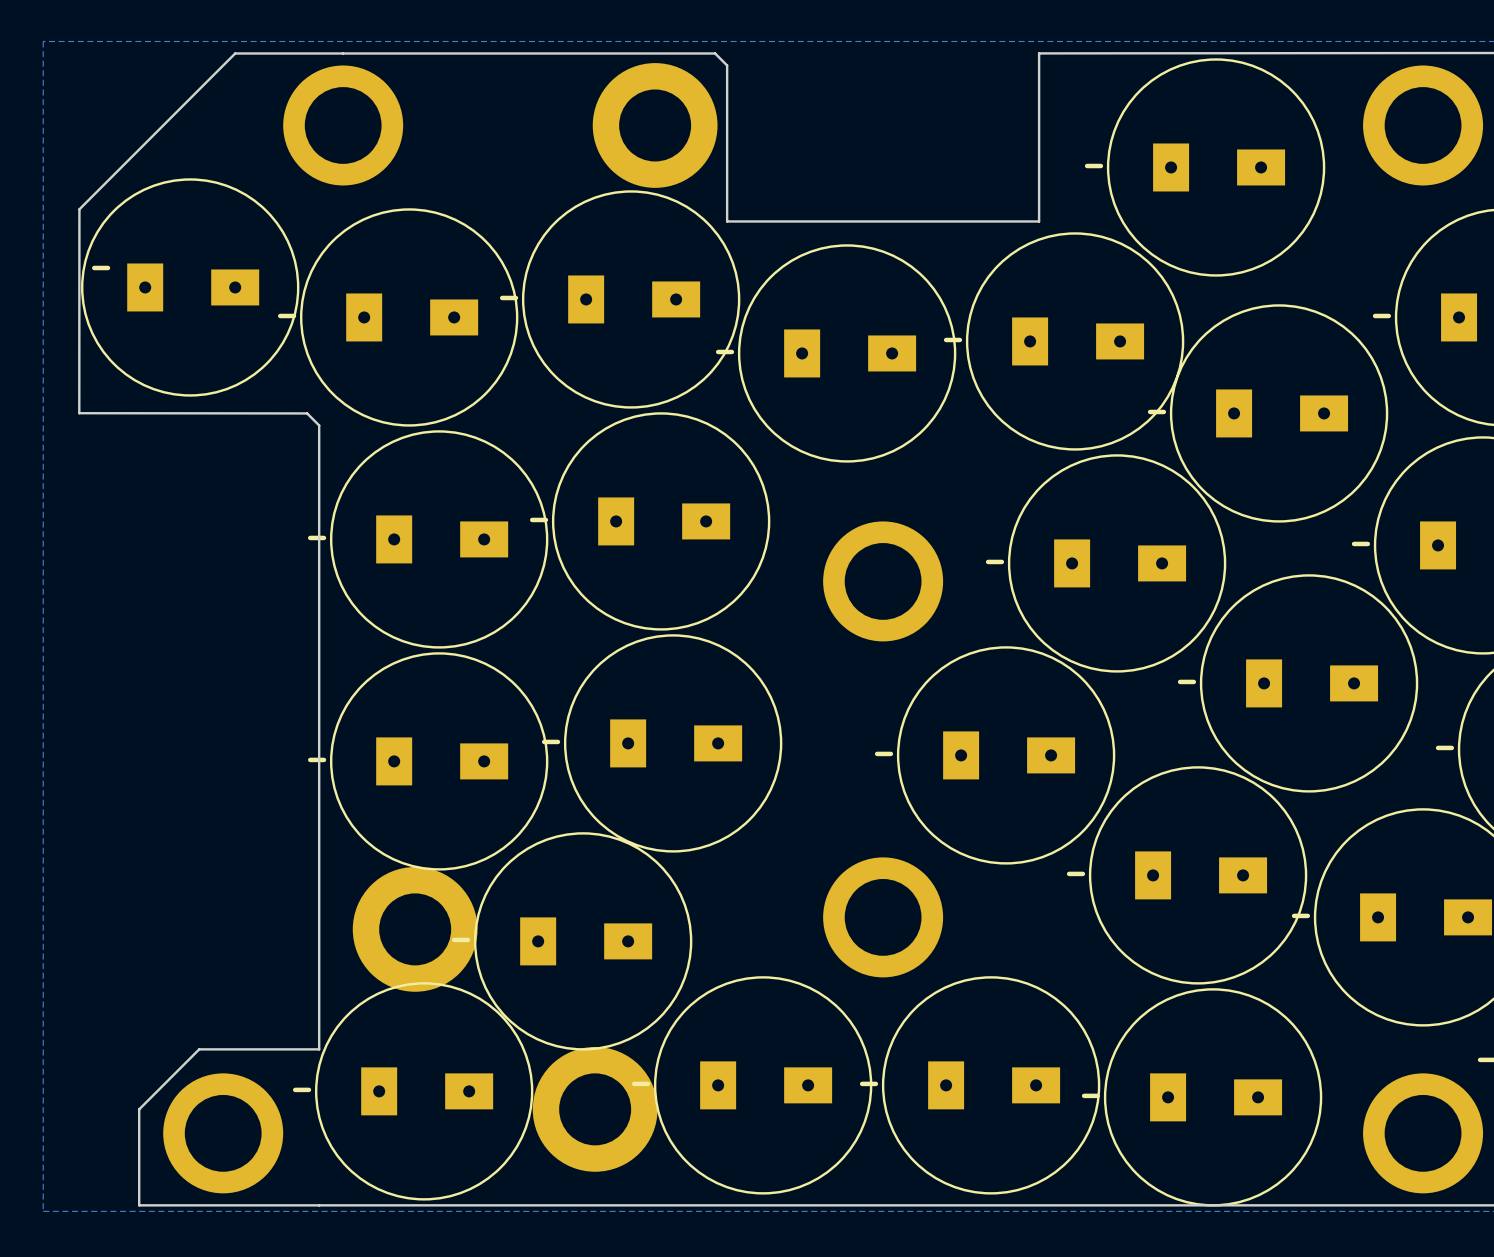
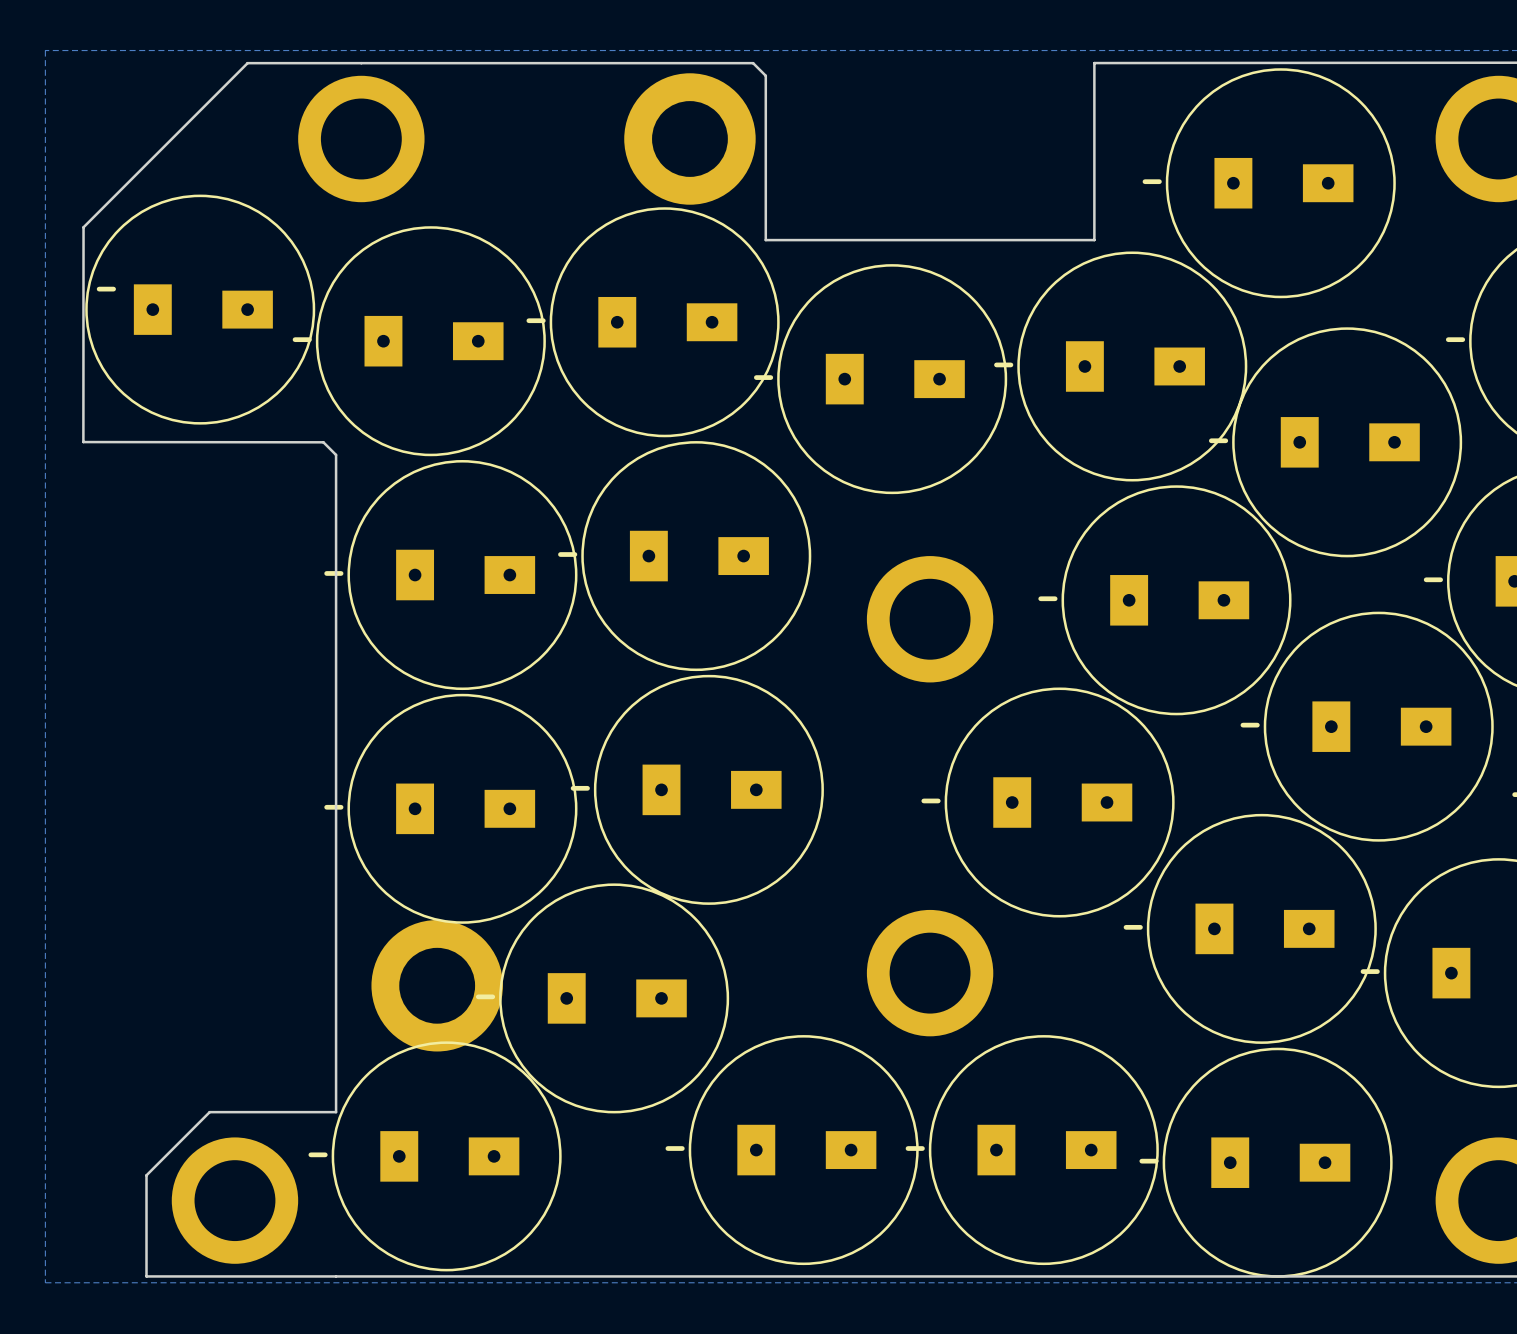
part: (595, 1109) -> none

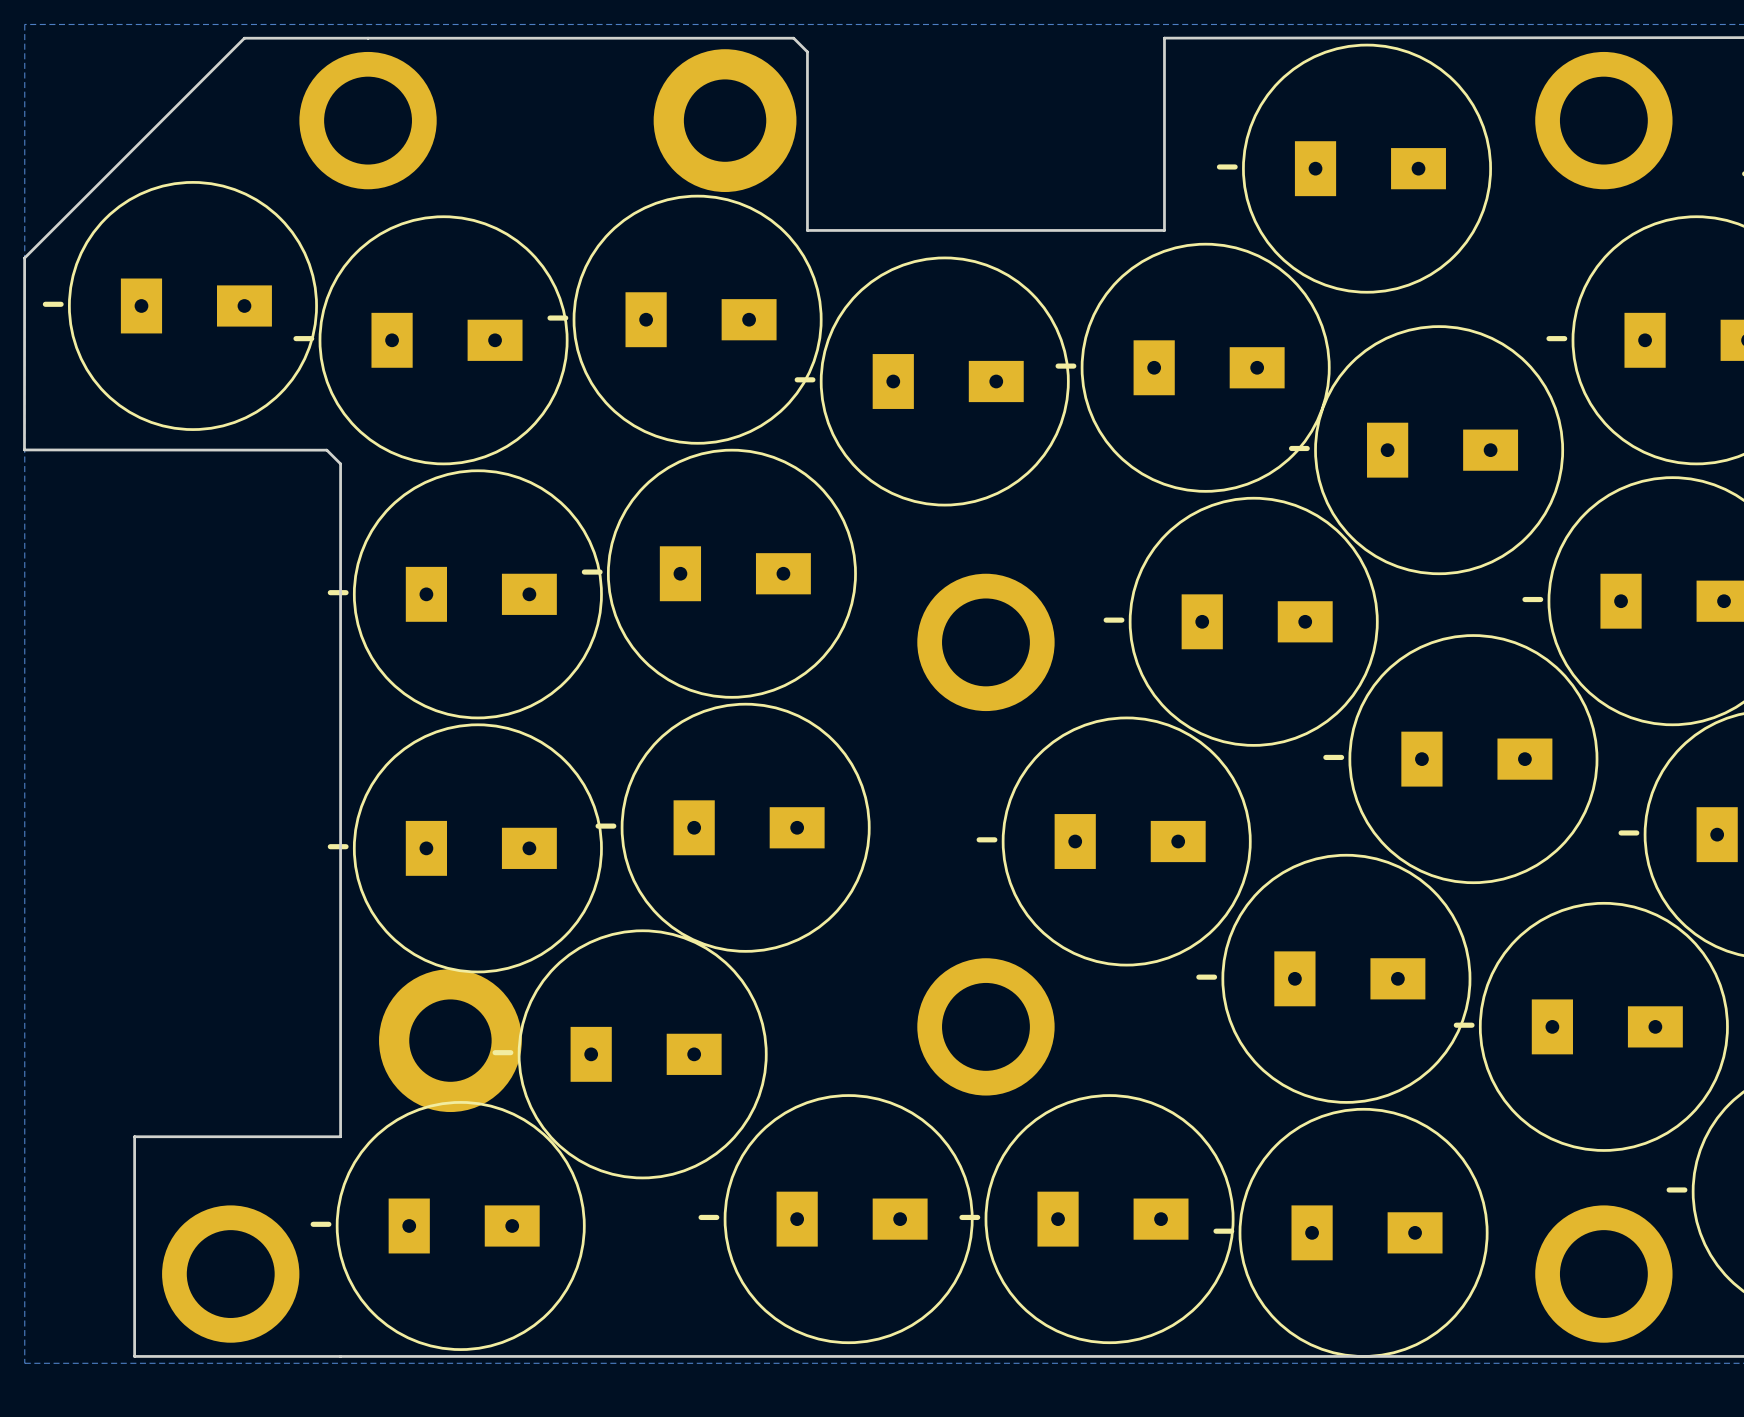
board edge: (247, 63) (83, 227) (83, 442) (323, 442) -> (244, 38) (24, 258) (24, 449) (326, 450)
part text position: - (106, 289) -> - (53, 304)
board edge: (336, 1074) (336, 1112) (209, 1112) (146, 1175) -> (340, 1136) (134, 1136) (134, 1246)

